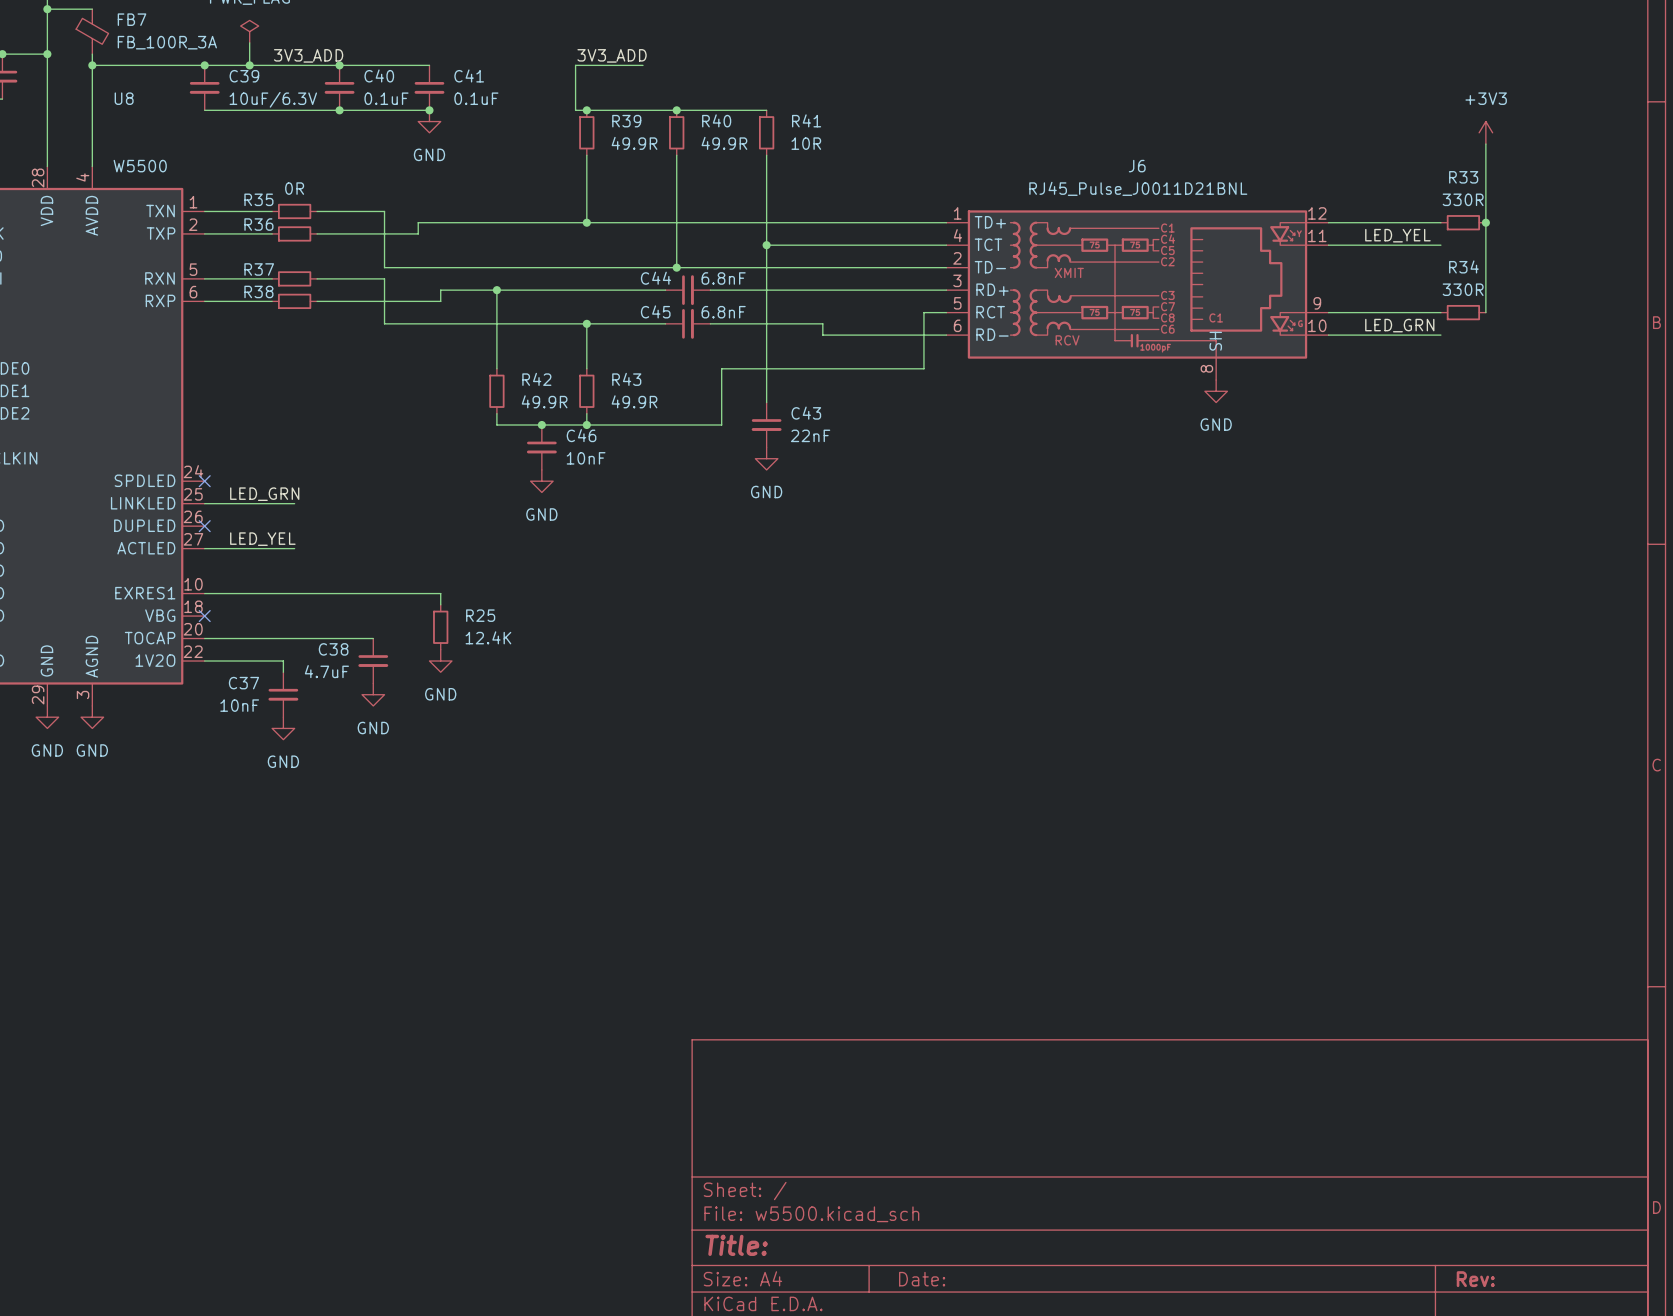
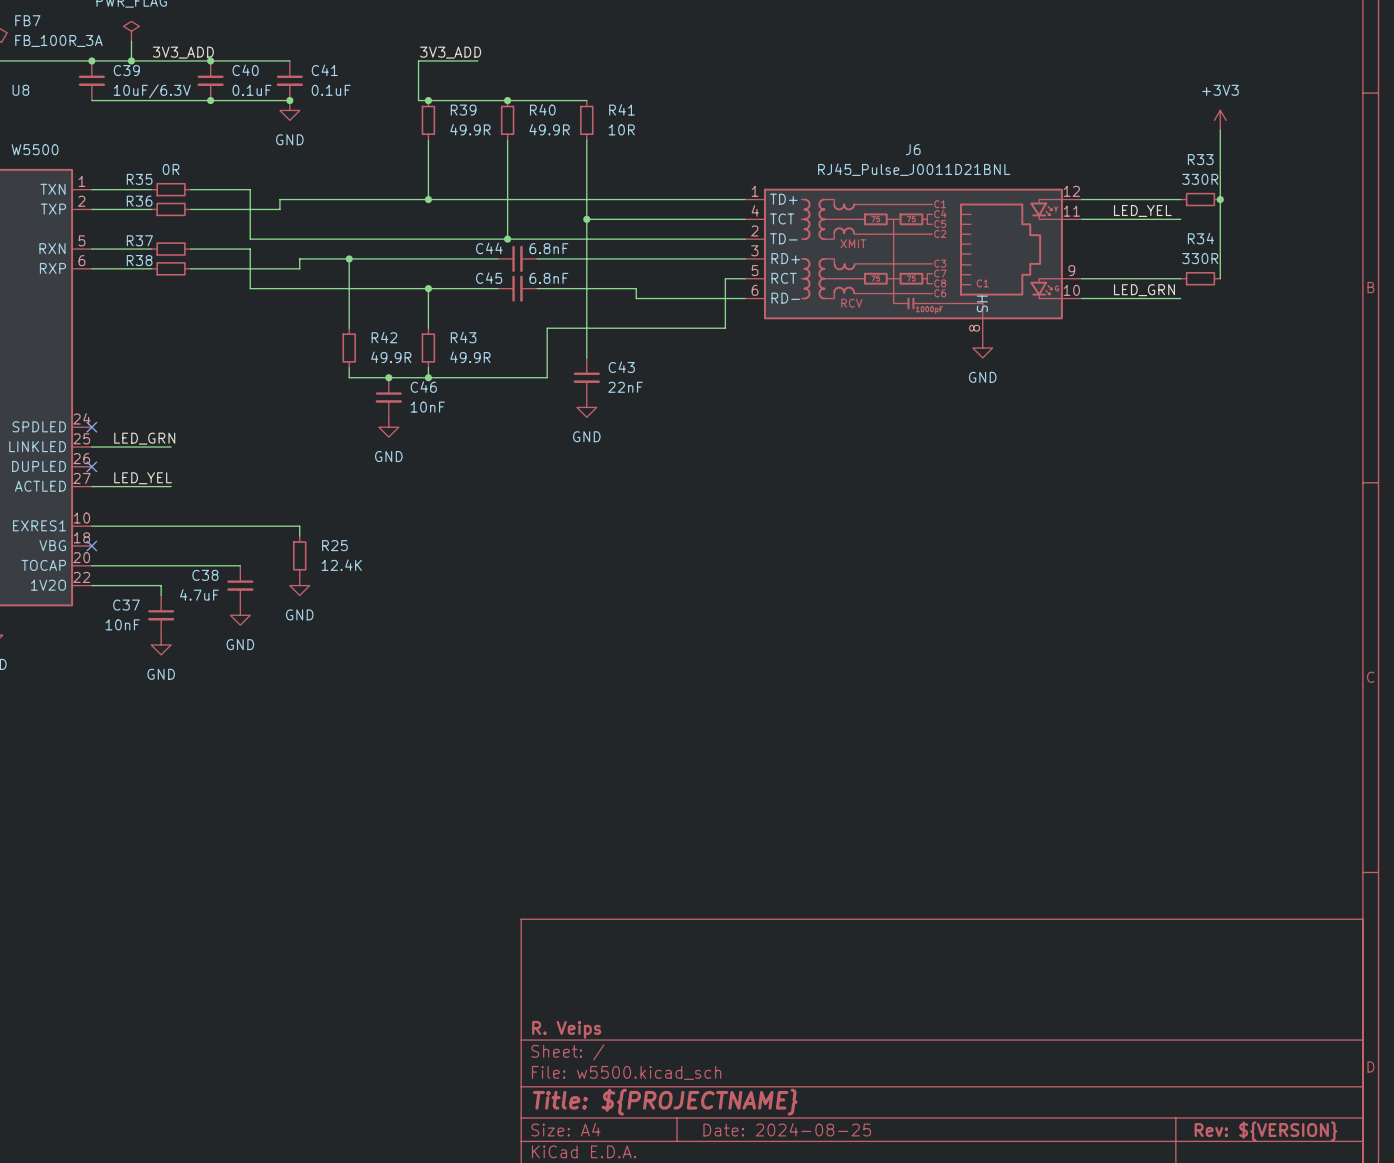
title block: none -> R. Veips (566, 1029)
title block: Title: (736, 1245) -> Title: ${PROJECTNAME} (665, 1102)
title block: Date: (922, 1279) -> Date: 2024-08-25 (787, 1129)
title block: Rev: (1475, 1279) -> Rev: ${VERSION} (1265, 1131)

